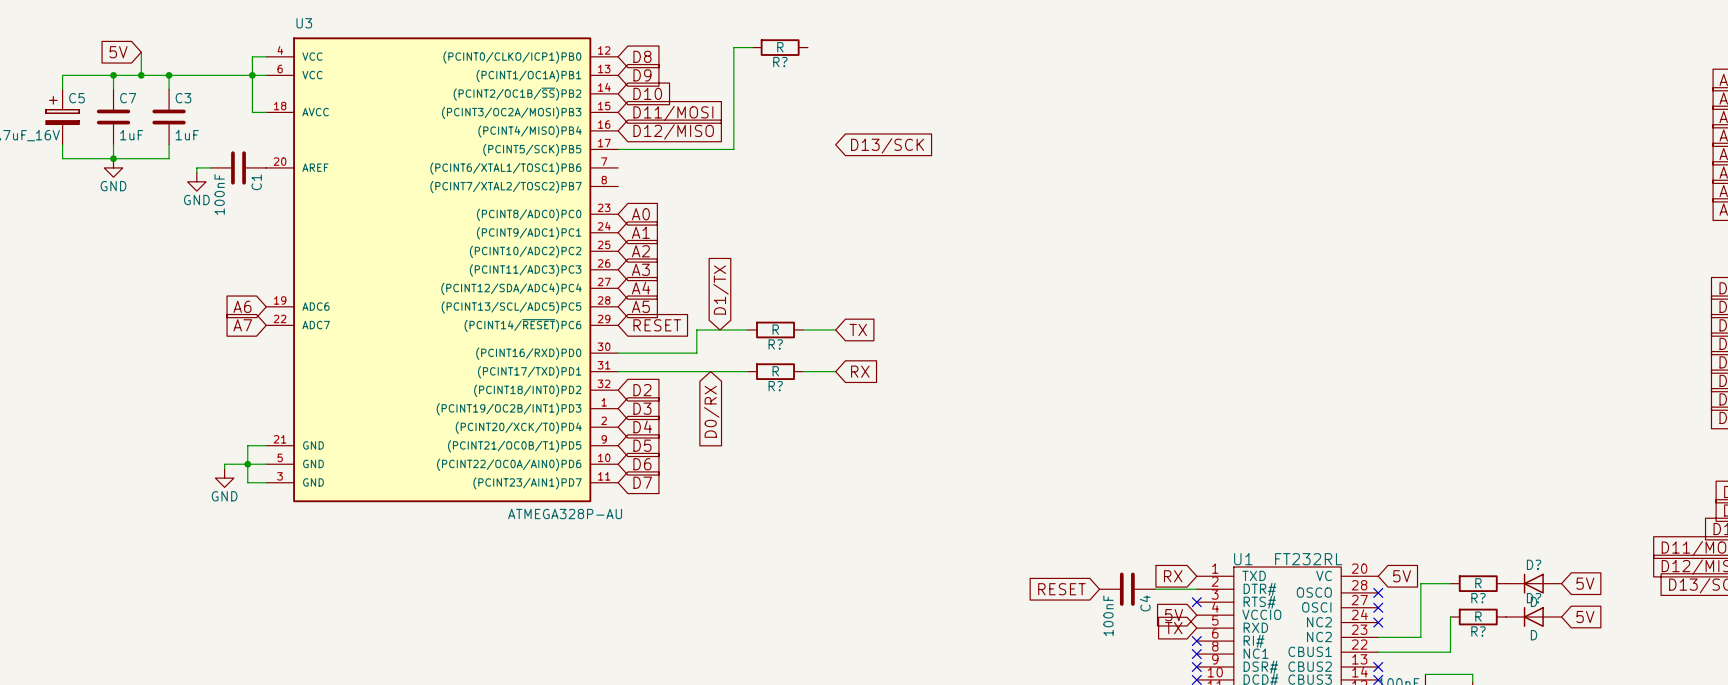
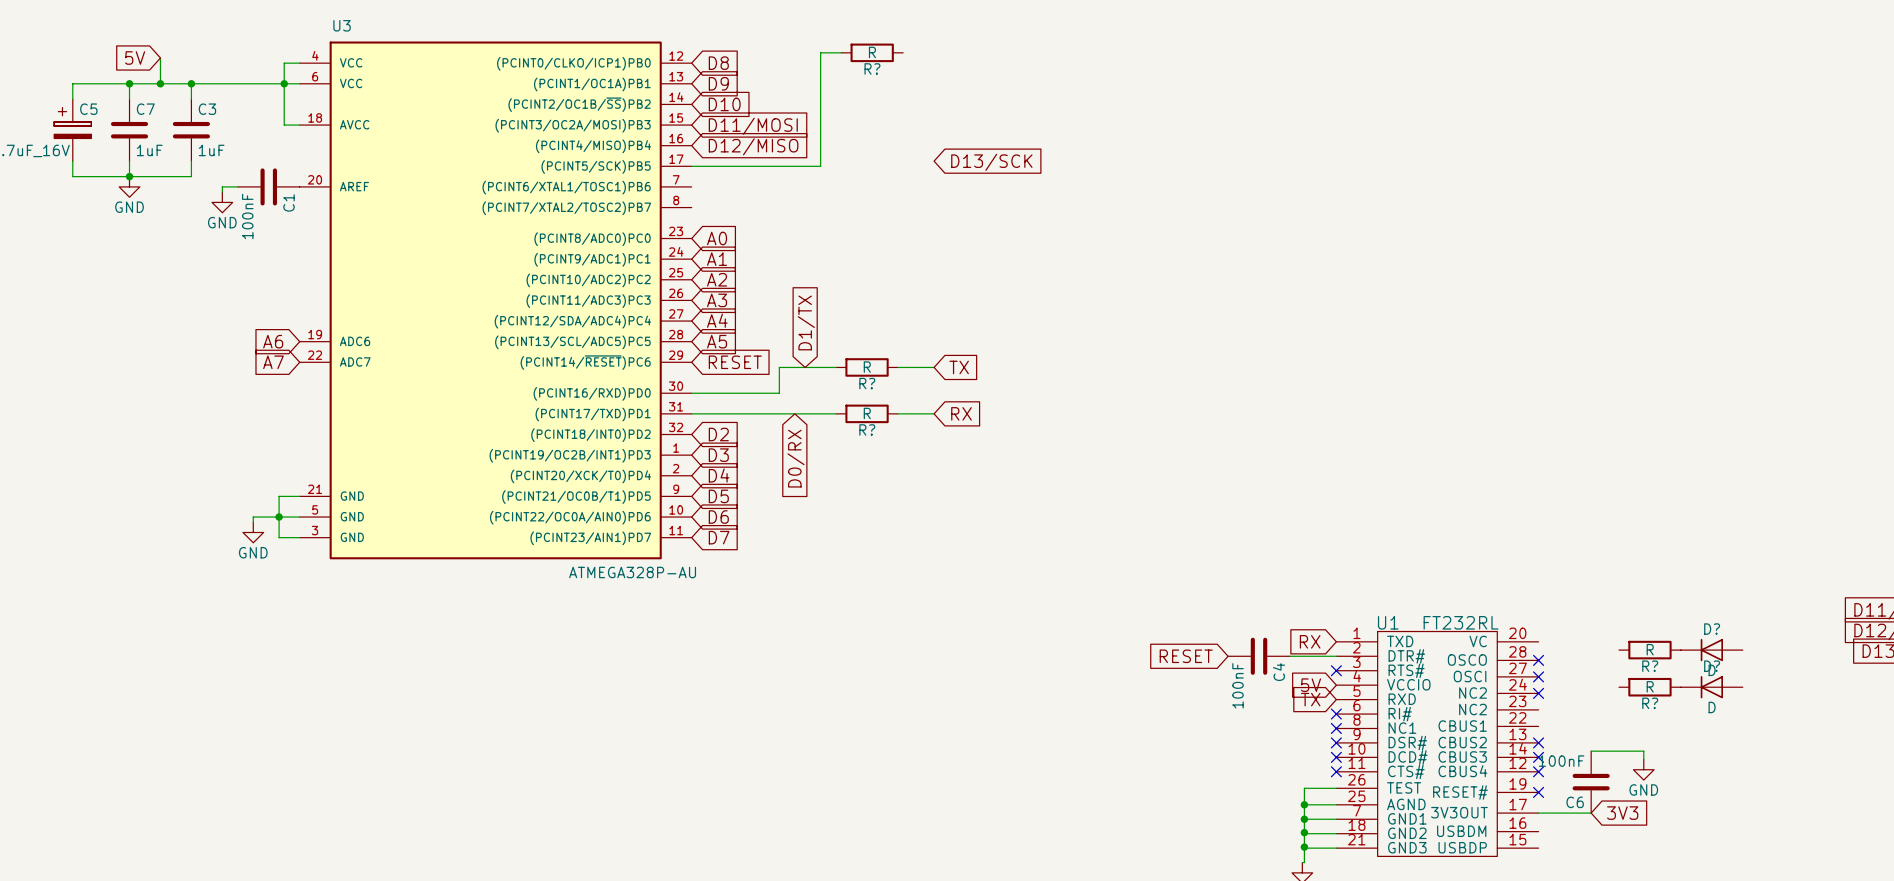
global label: 5V (1402, 576) -> none
wire: (1450, 583) (1420, 583) (1420, 637) (1378, 637) -> none
global label: 5V (1585, 583) -> none
wire: (1450, 617) (1450, 652) (1378, 652) -> none
global label: 5V (1585, 617) -> none

